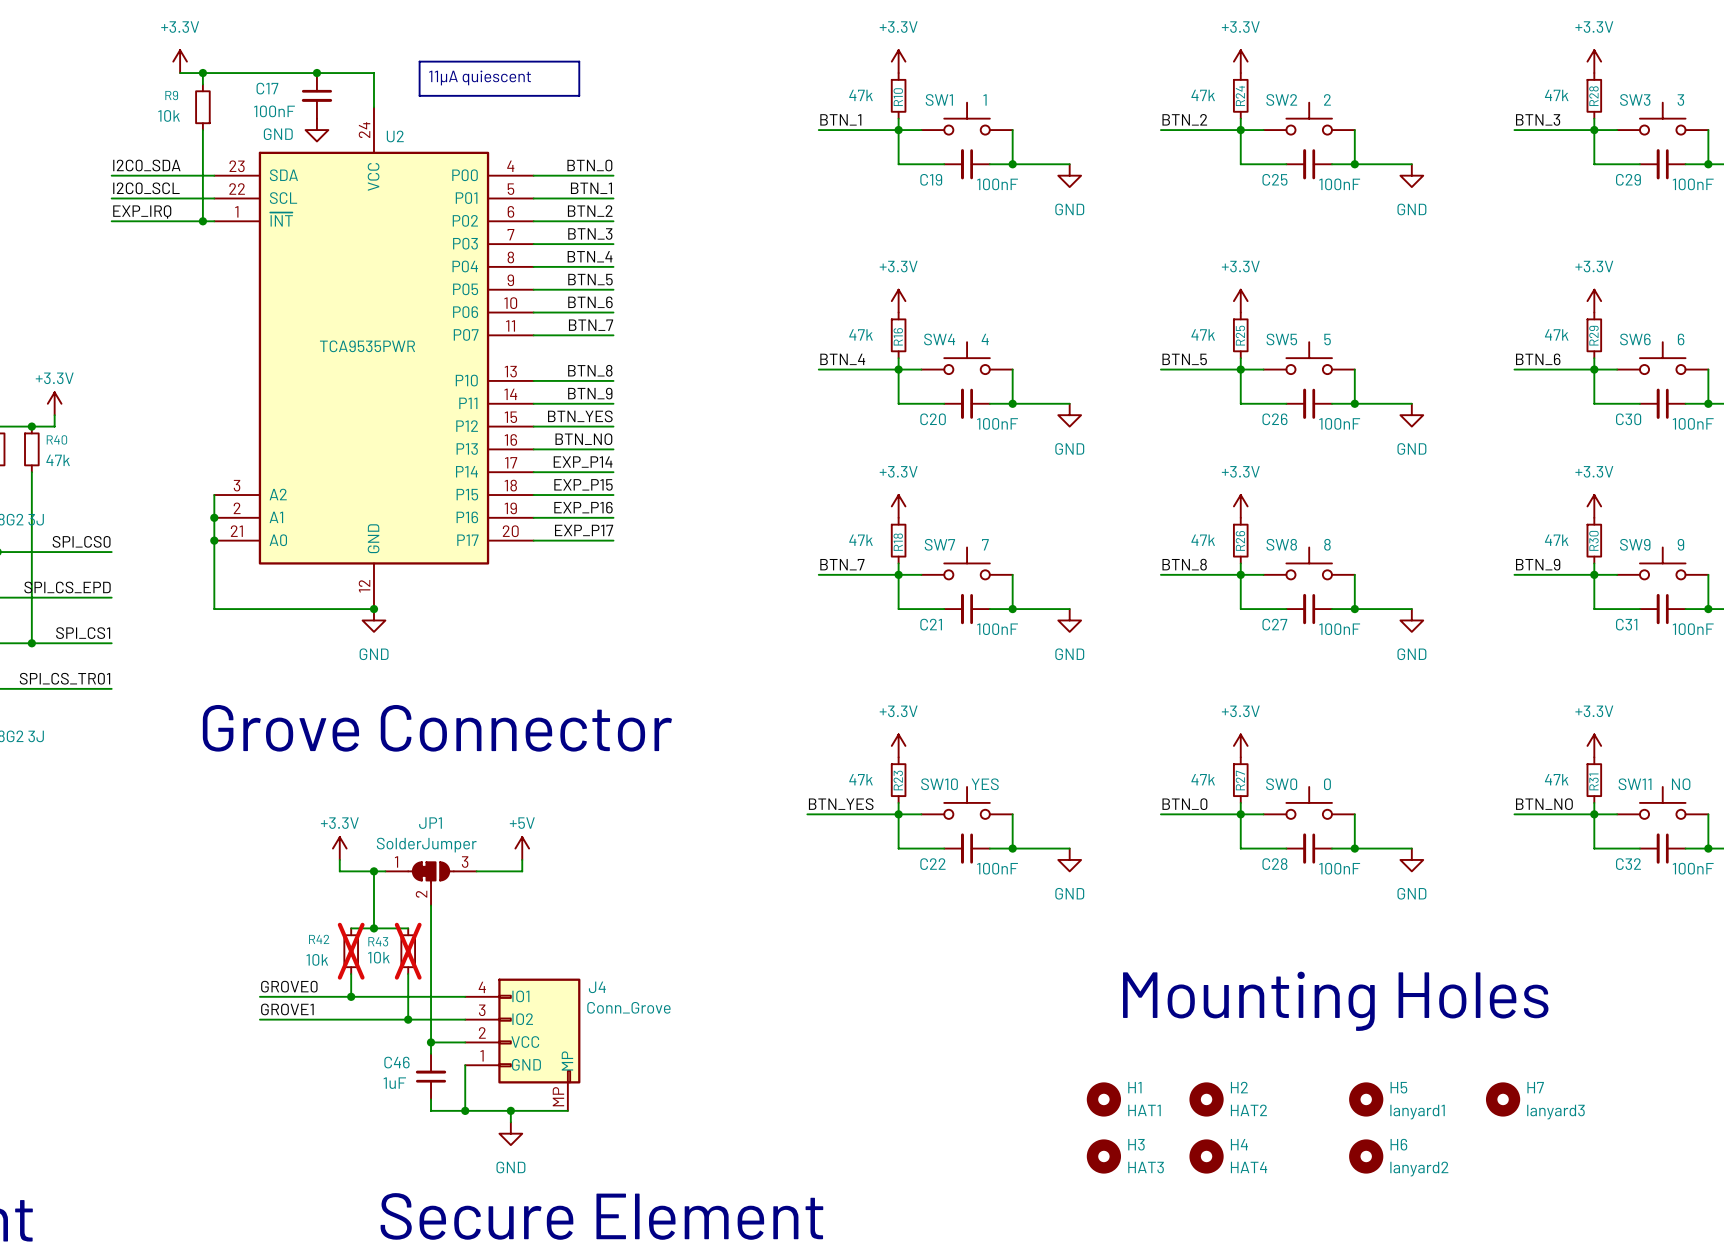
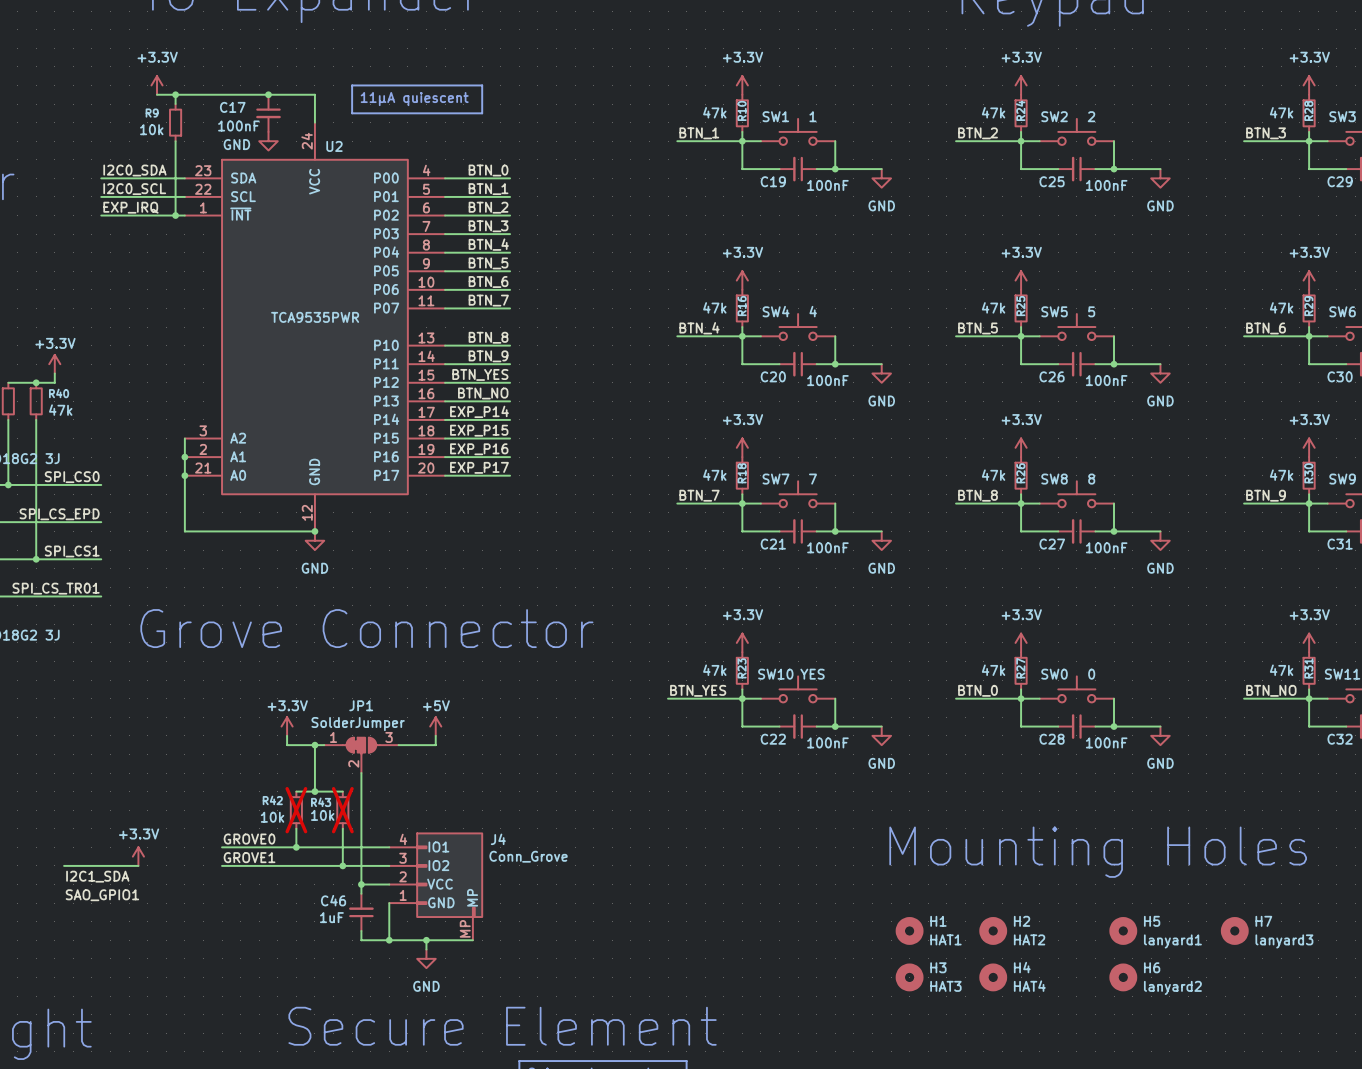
power symbol: none -> +3.3V (138, 856)
wire: none -> (64, 865) (138, 865)
label: none -> I2C1_SDA (97, 876)
label: none -> SAO_GPIO1 (102, 895)

